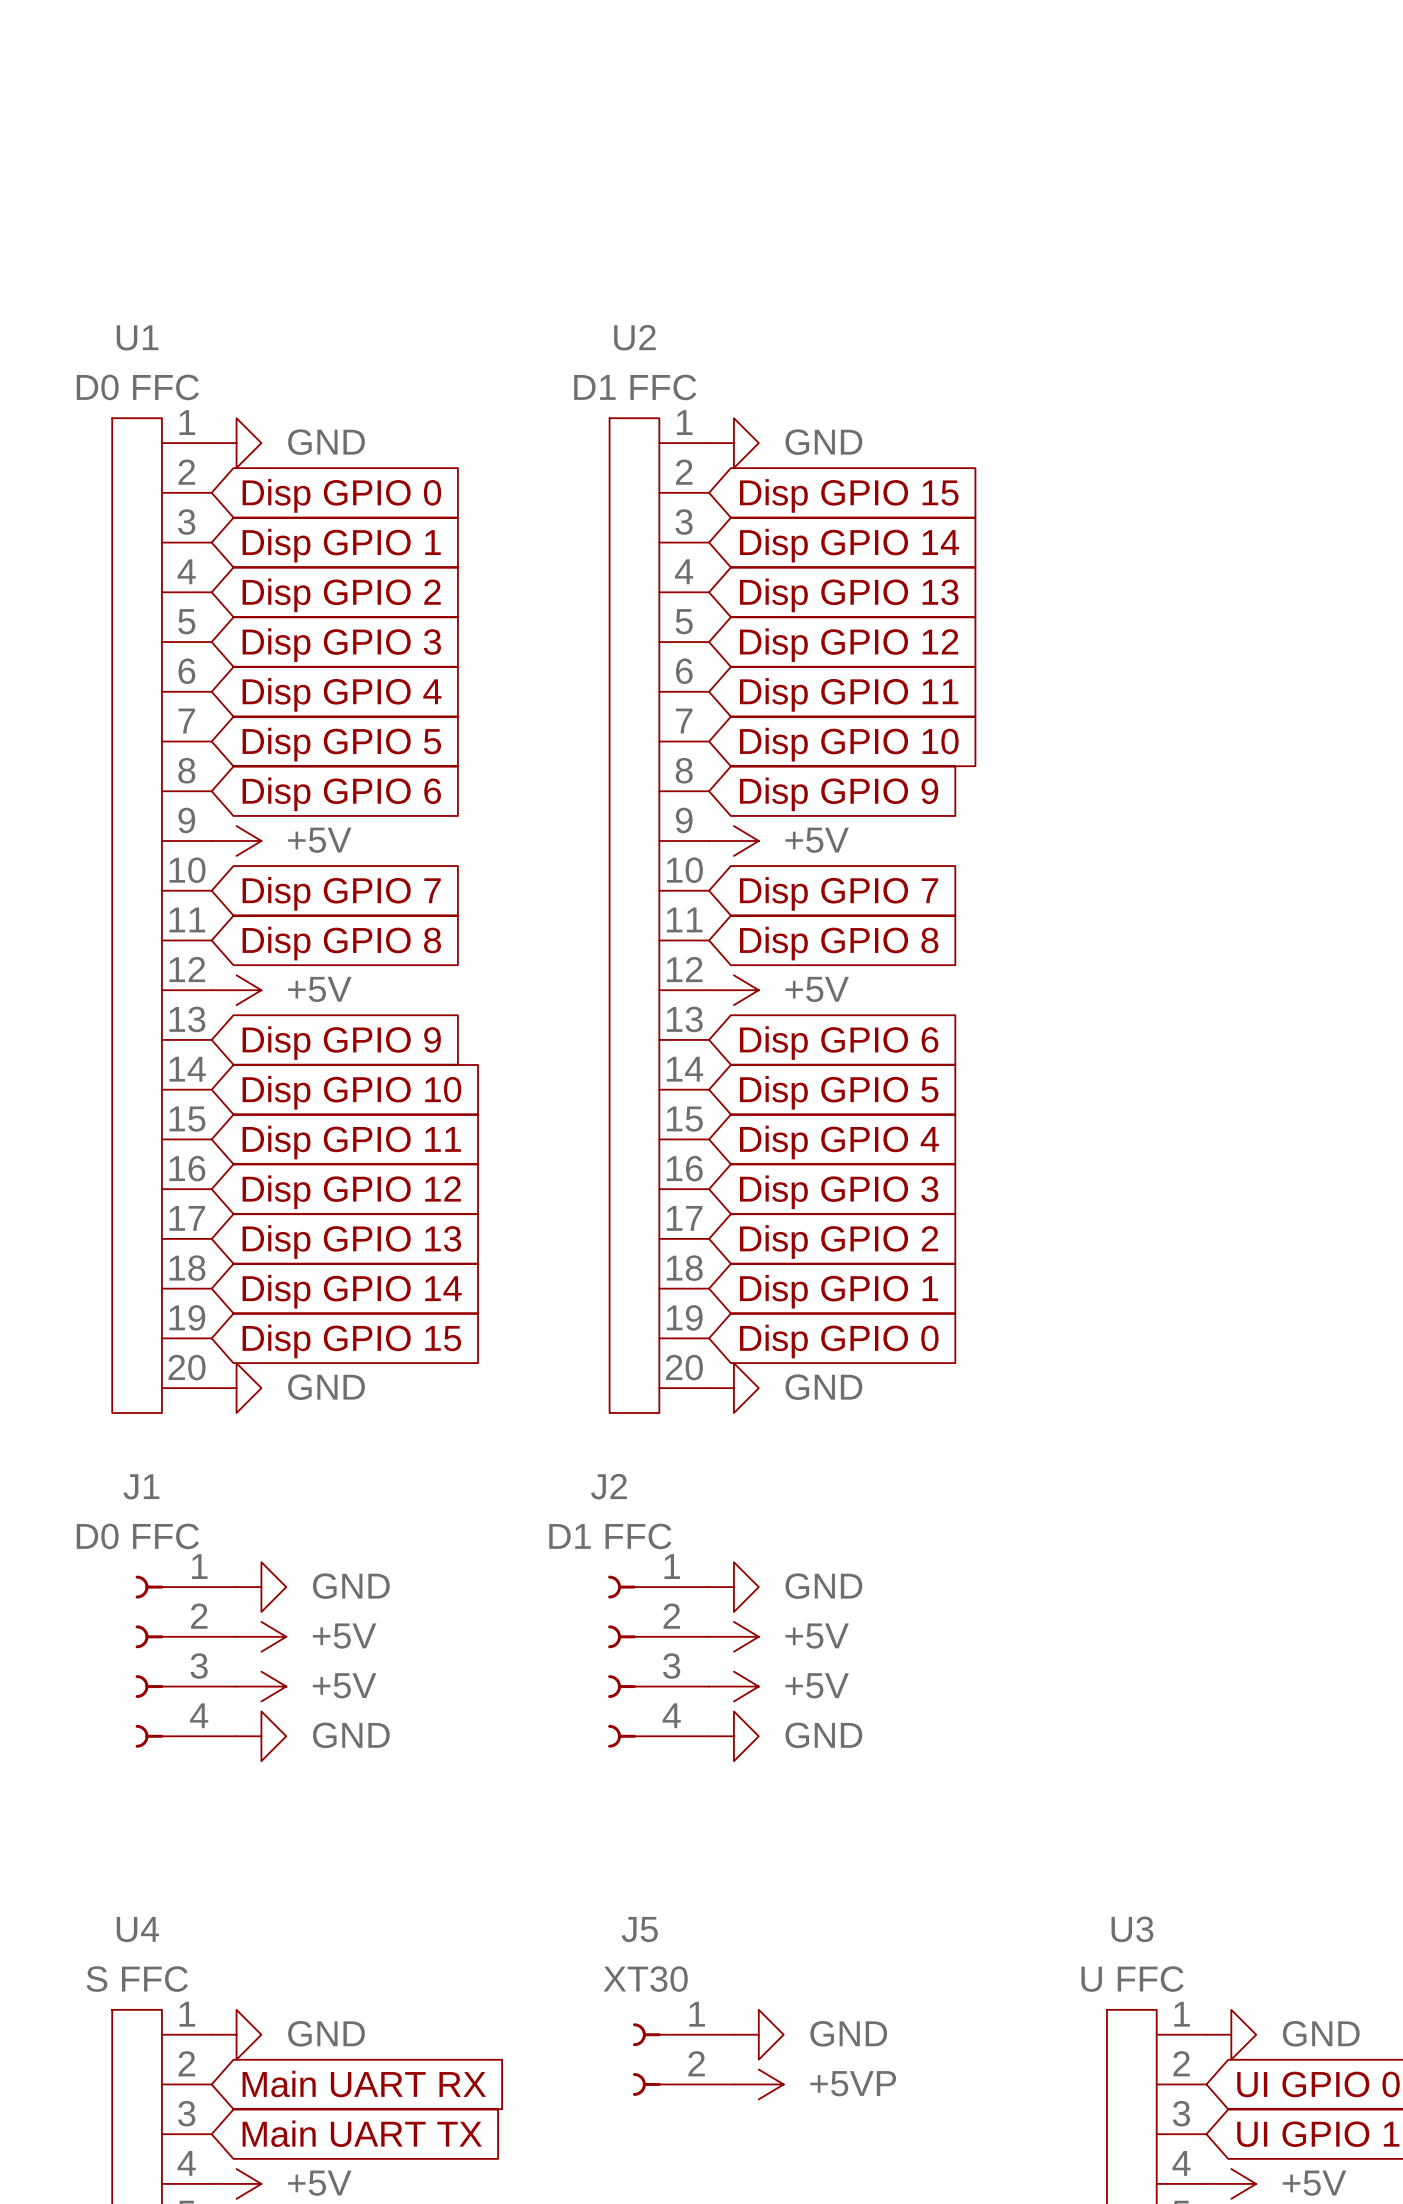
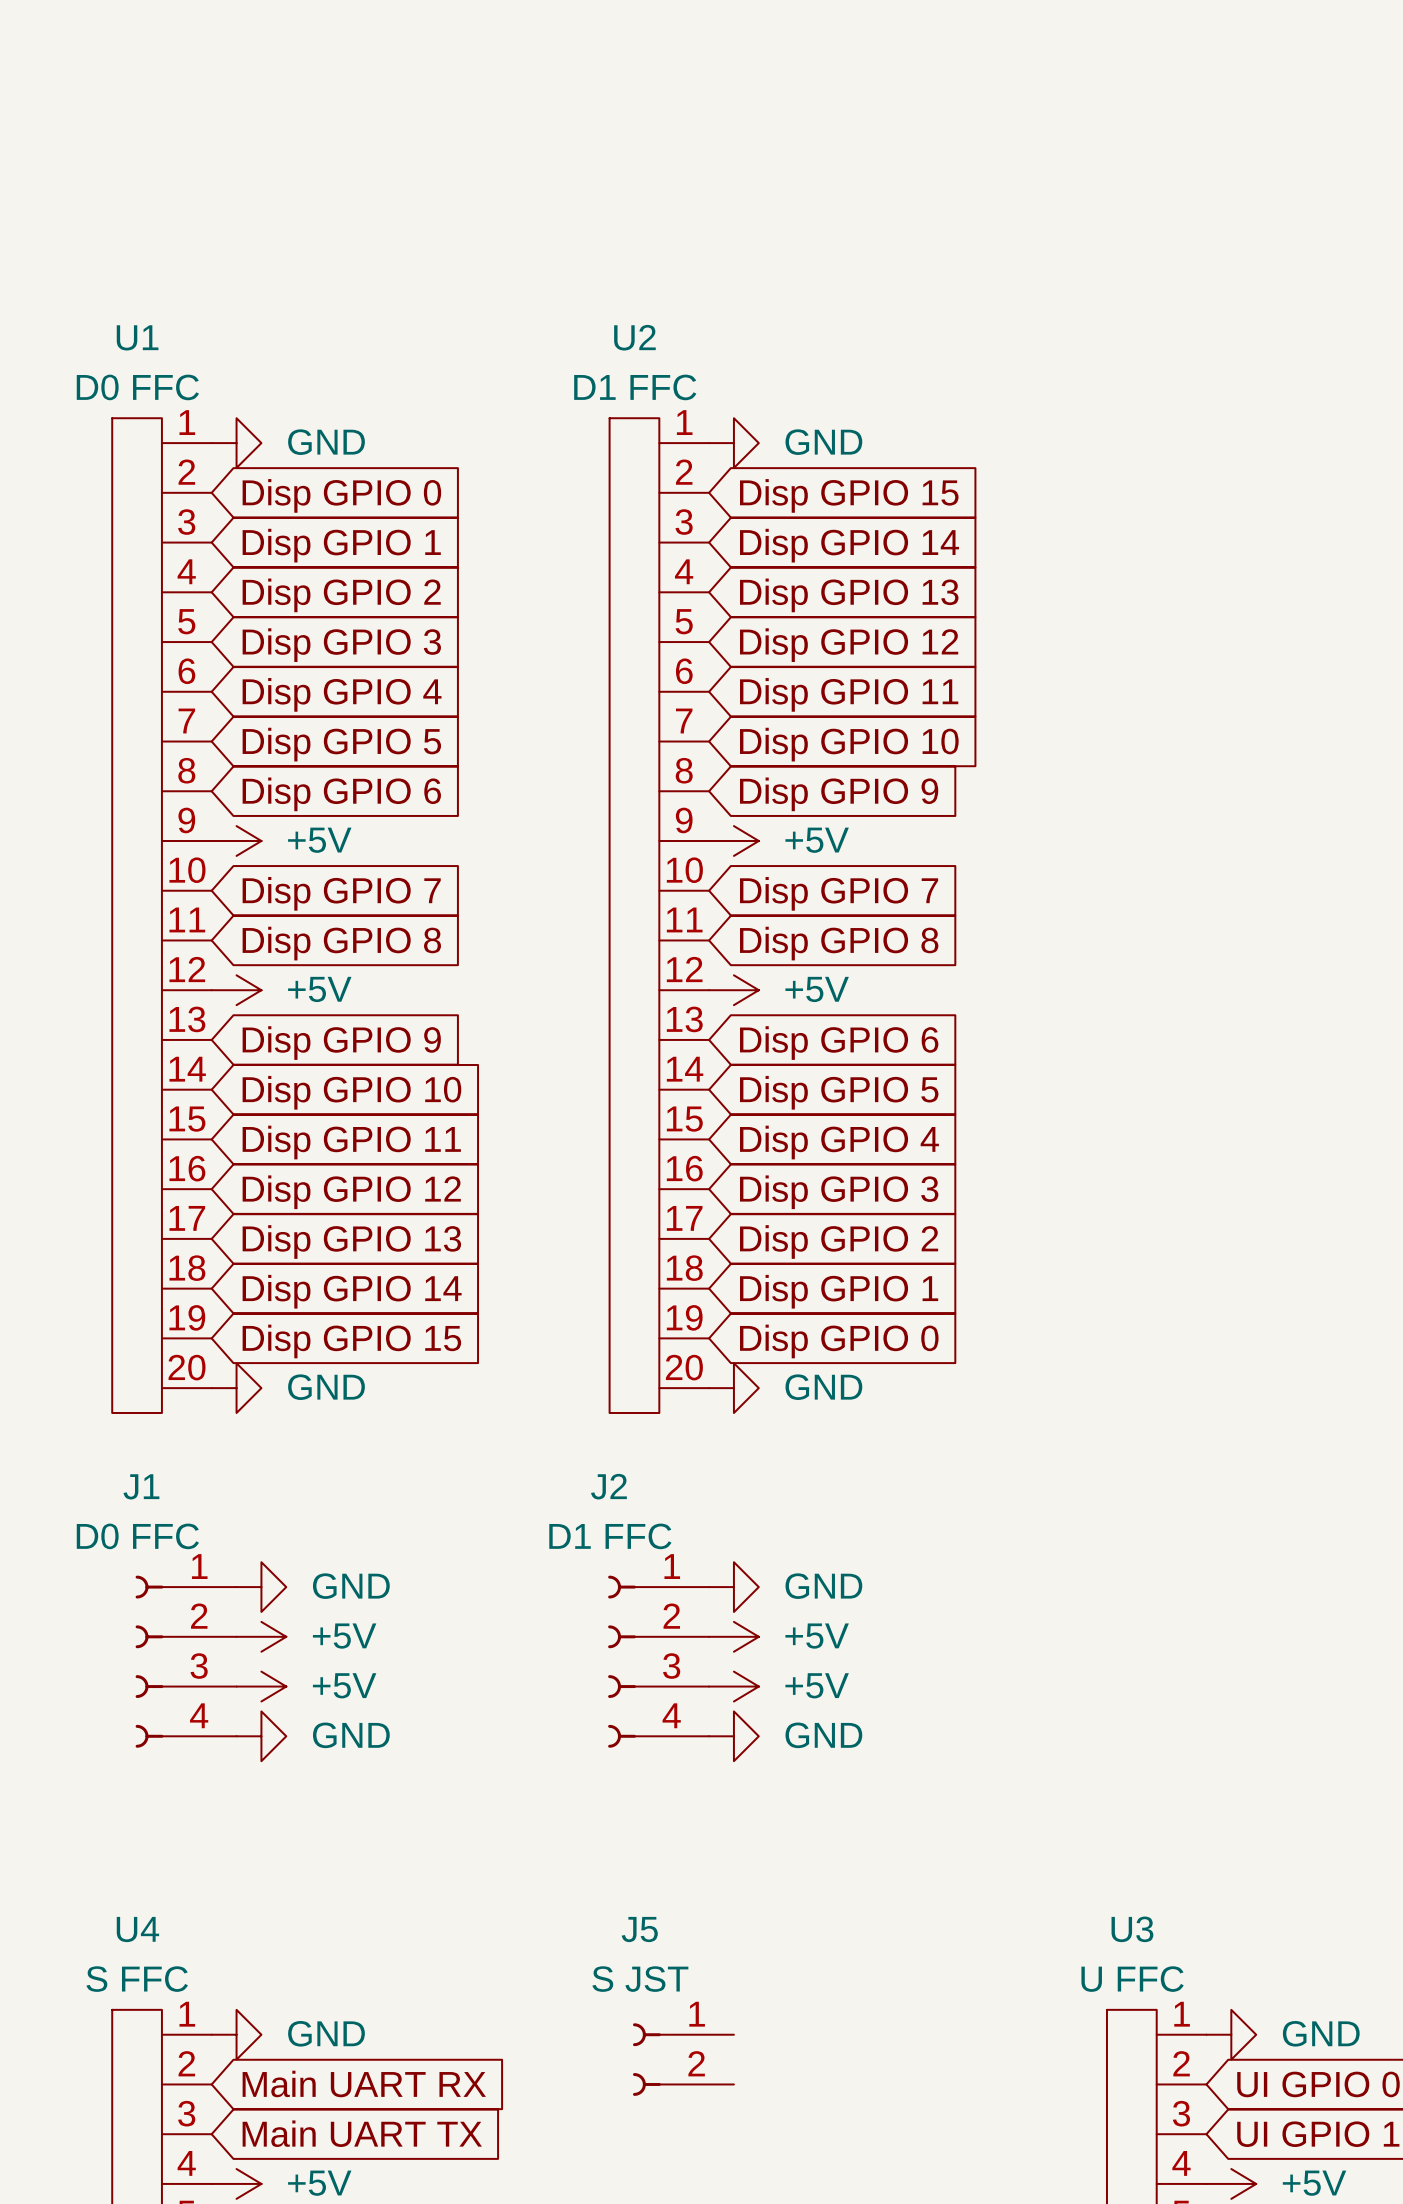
J5 value: XT30 (645, 1979) -> S JST (640, 1979)
power symbol: GND (758, 2034) -> none
power symbol: +5VP (758, 2084) -> none

